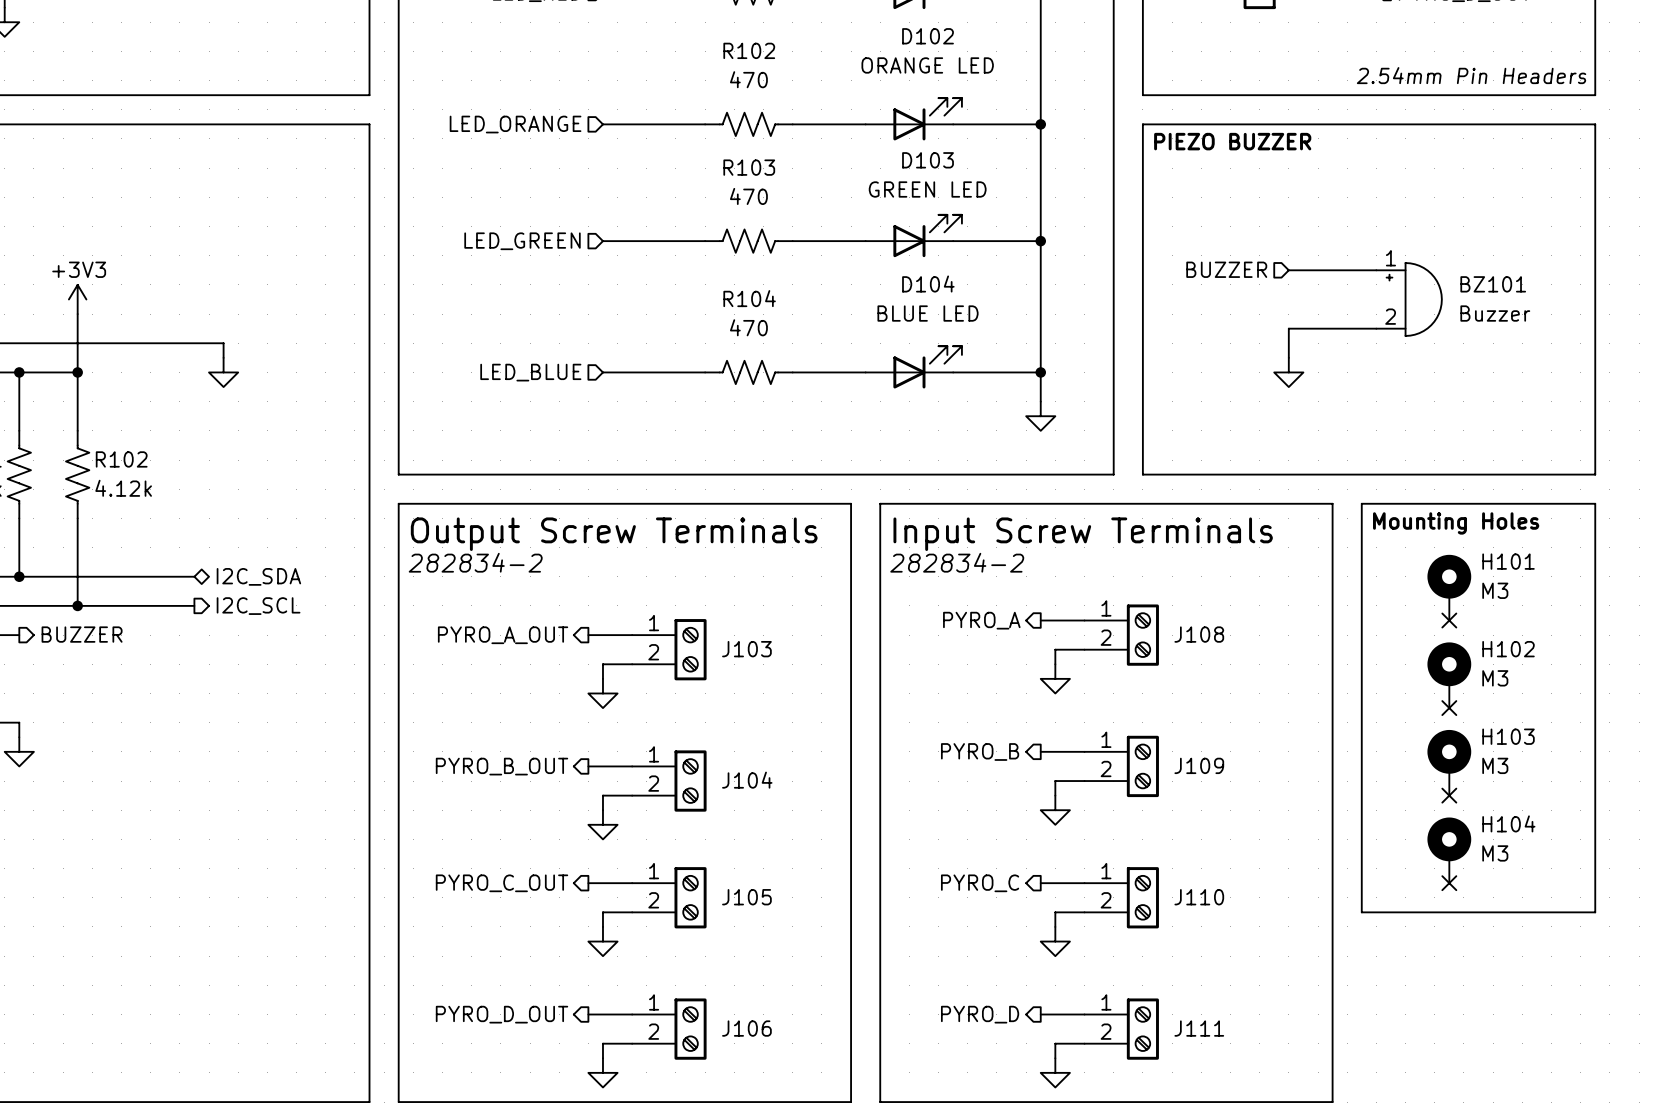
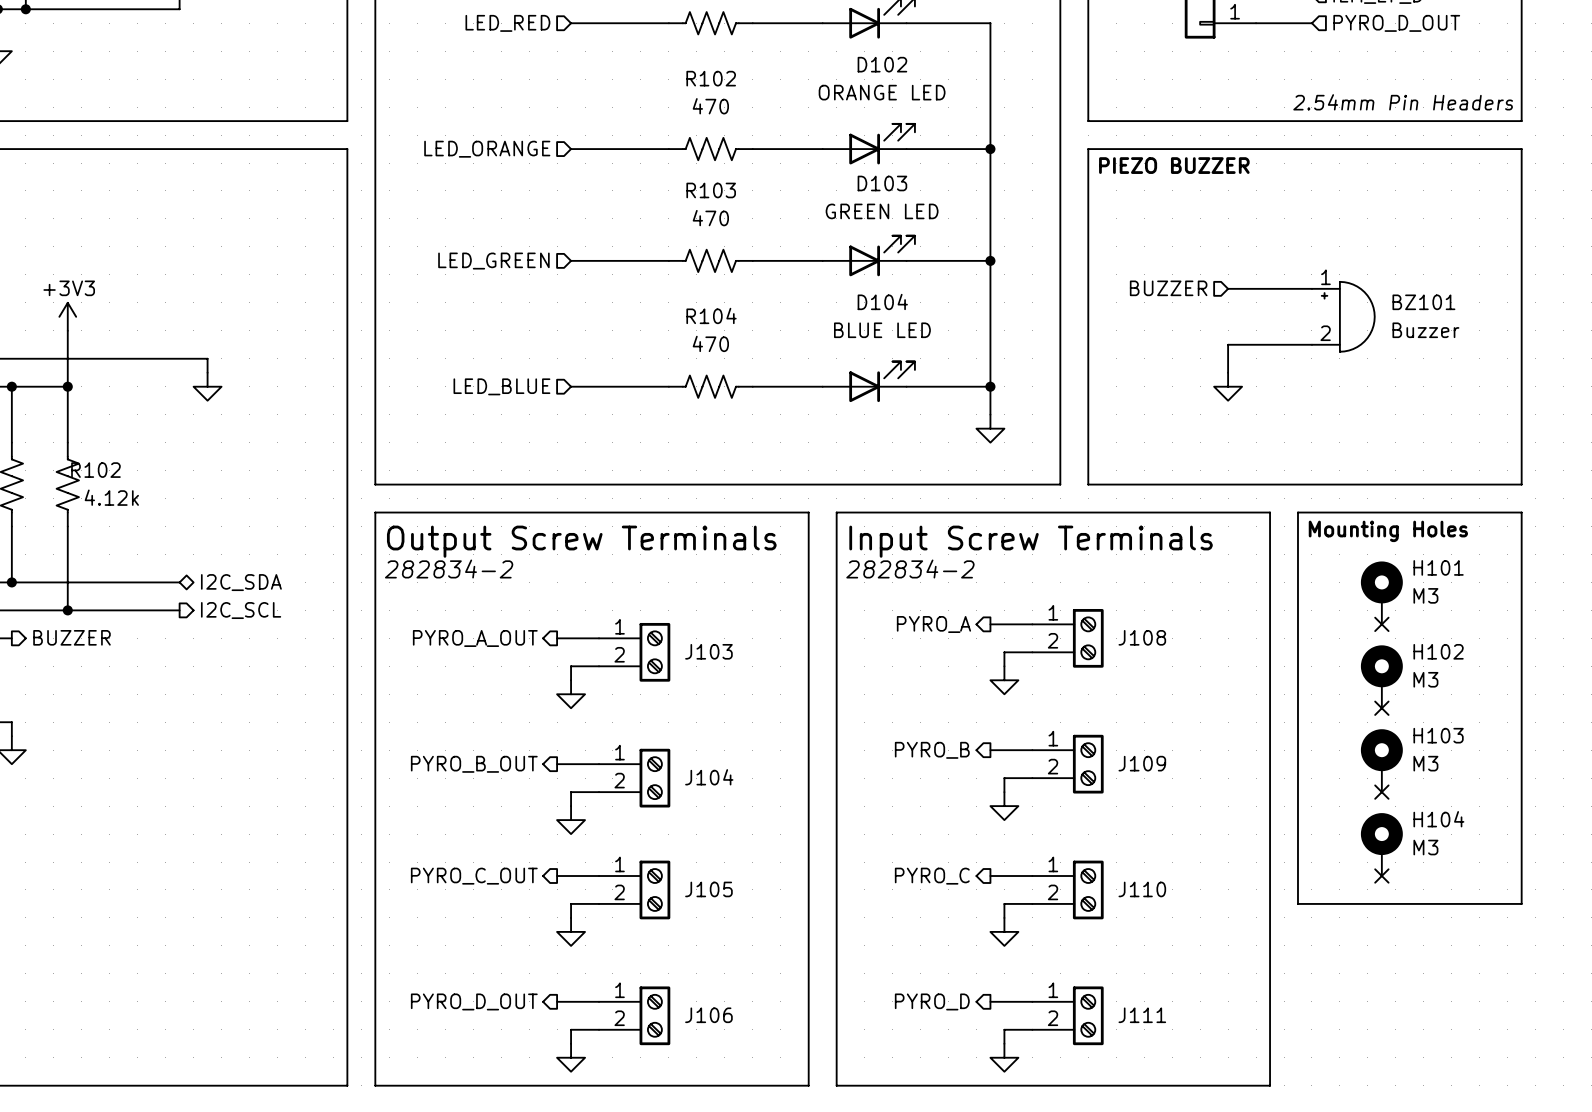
R102 name position: R102 (121, 459) -> R102 (95, 470)

